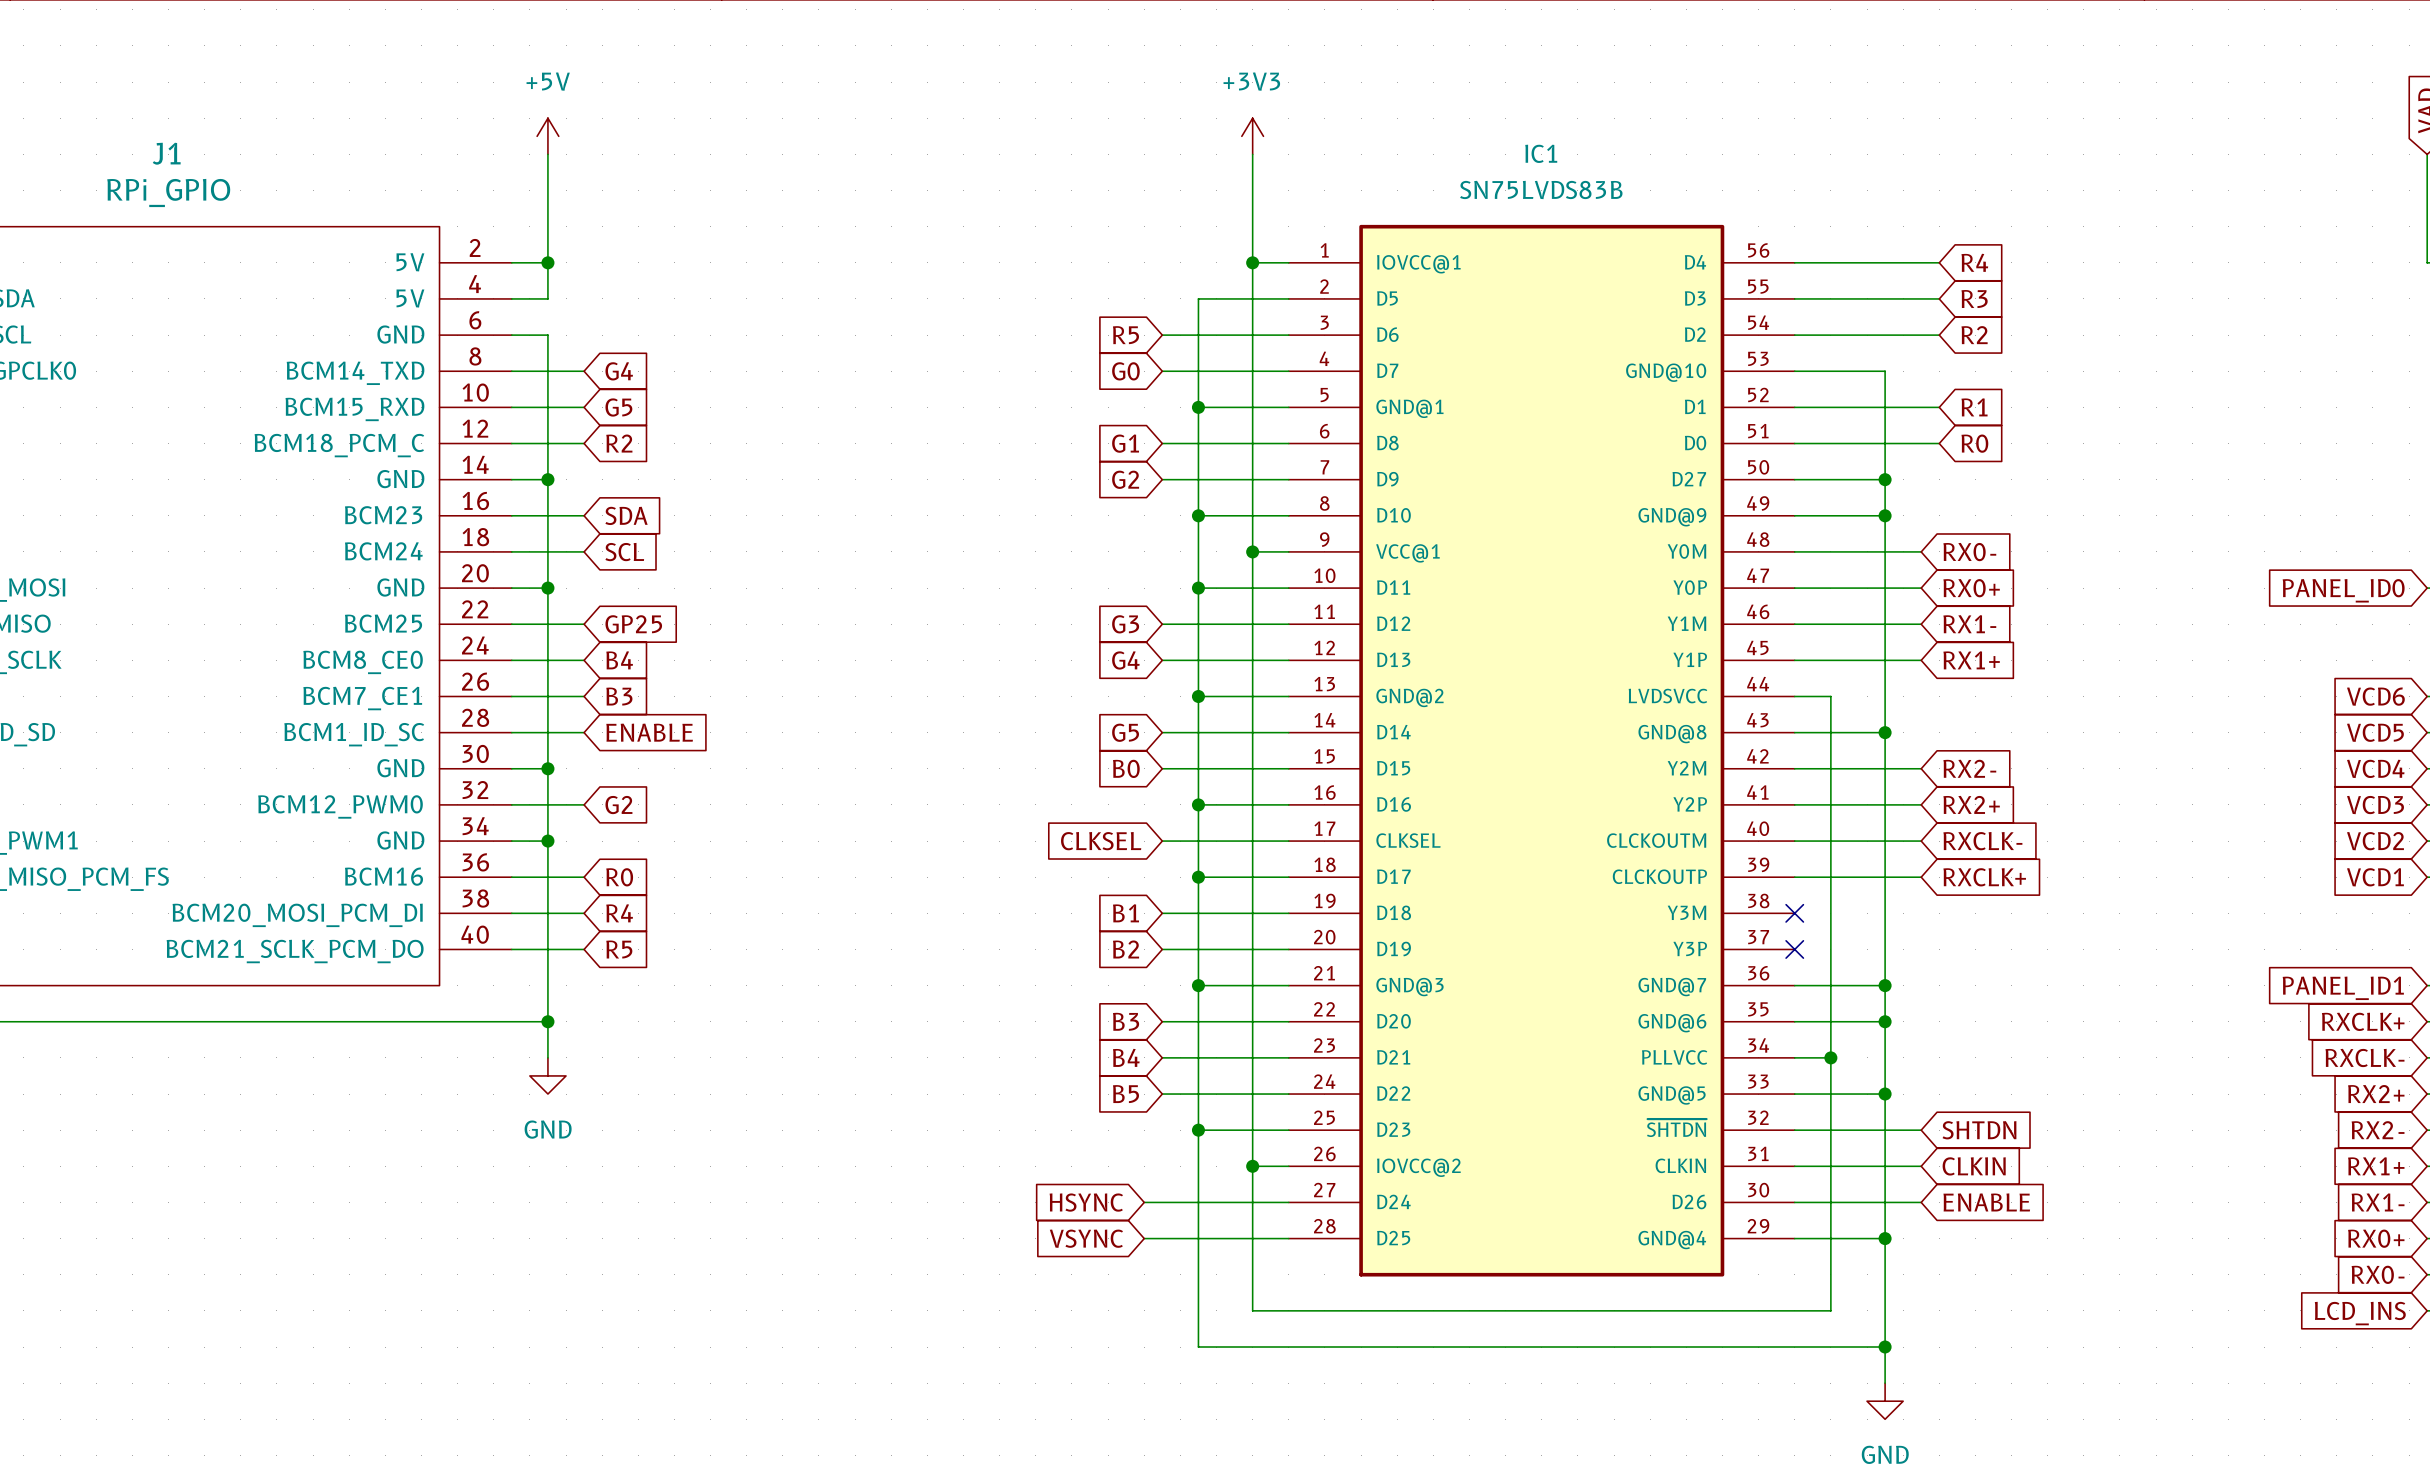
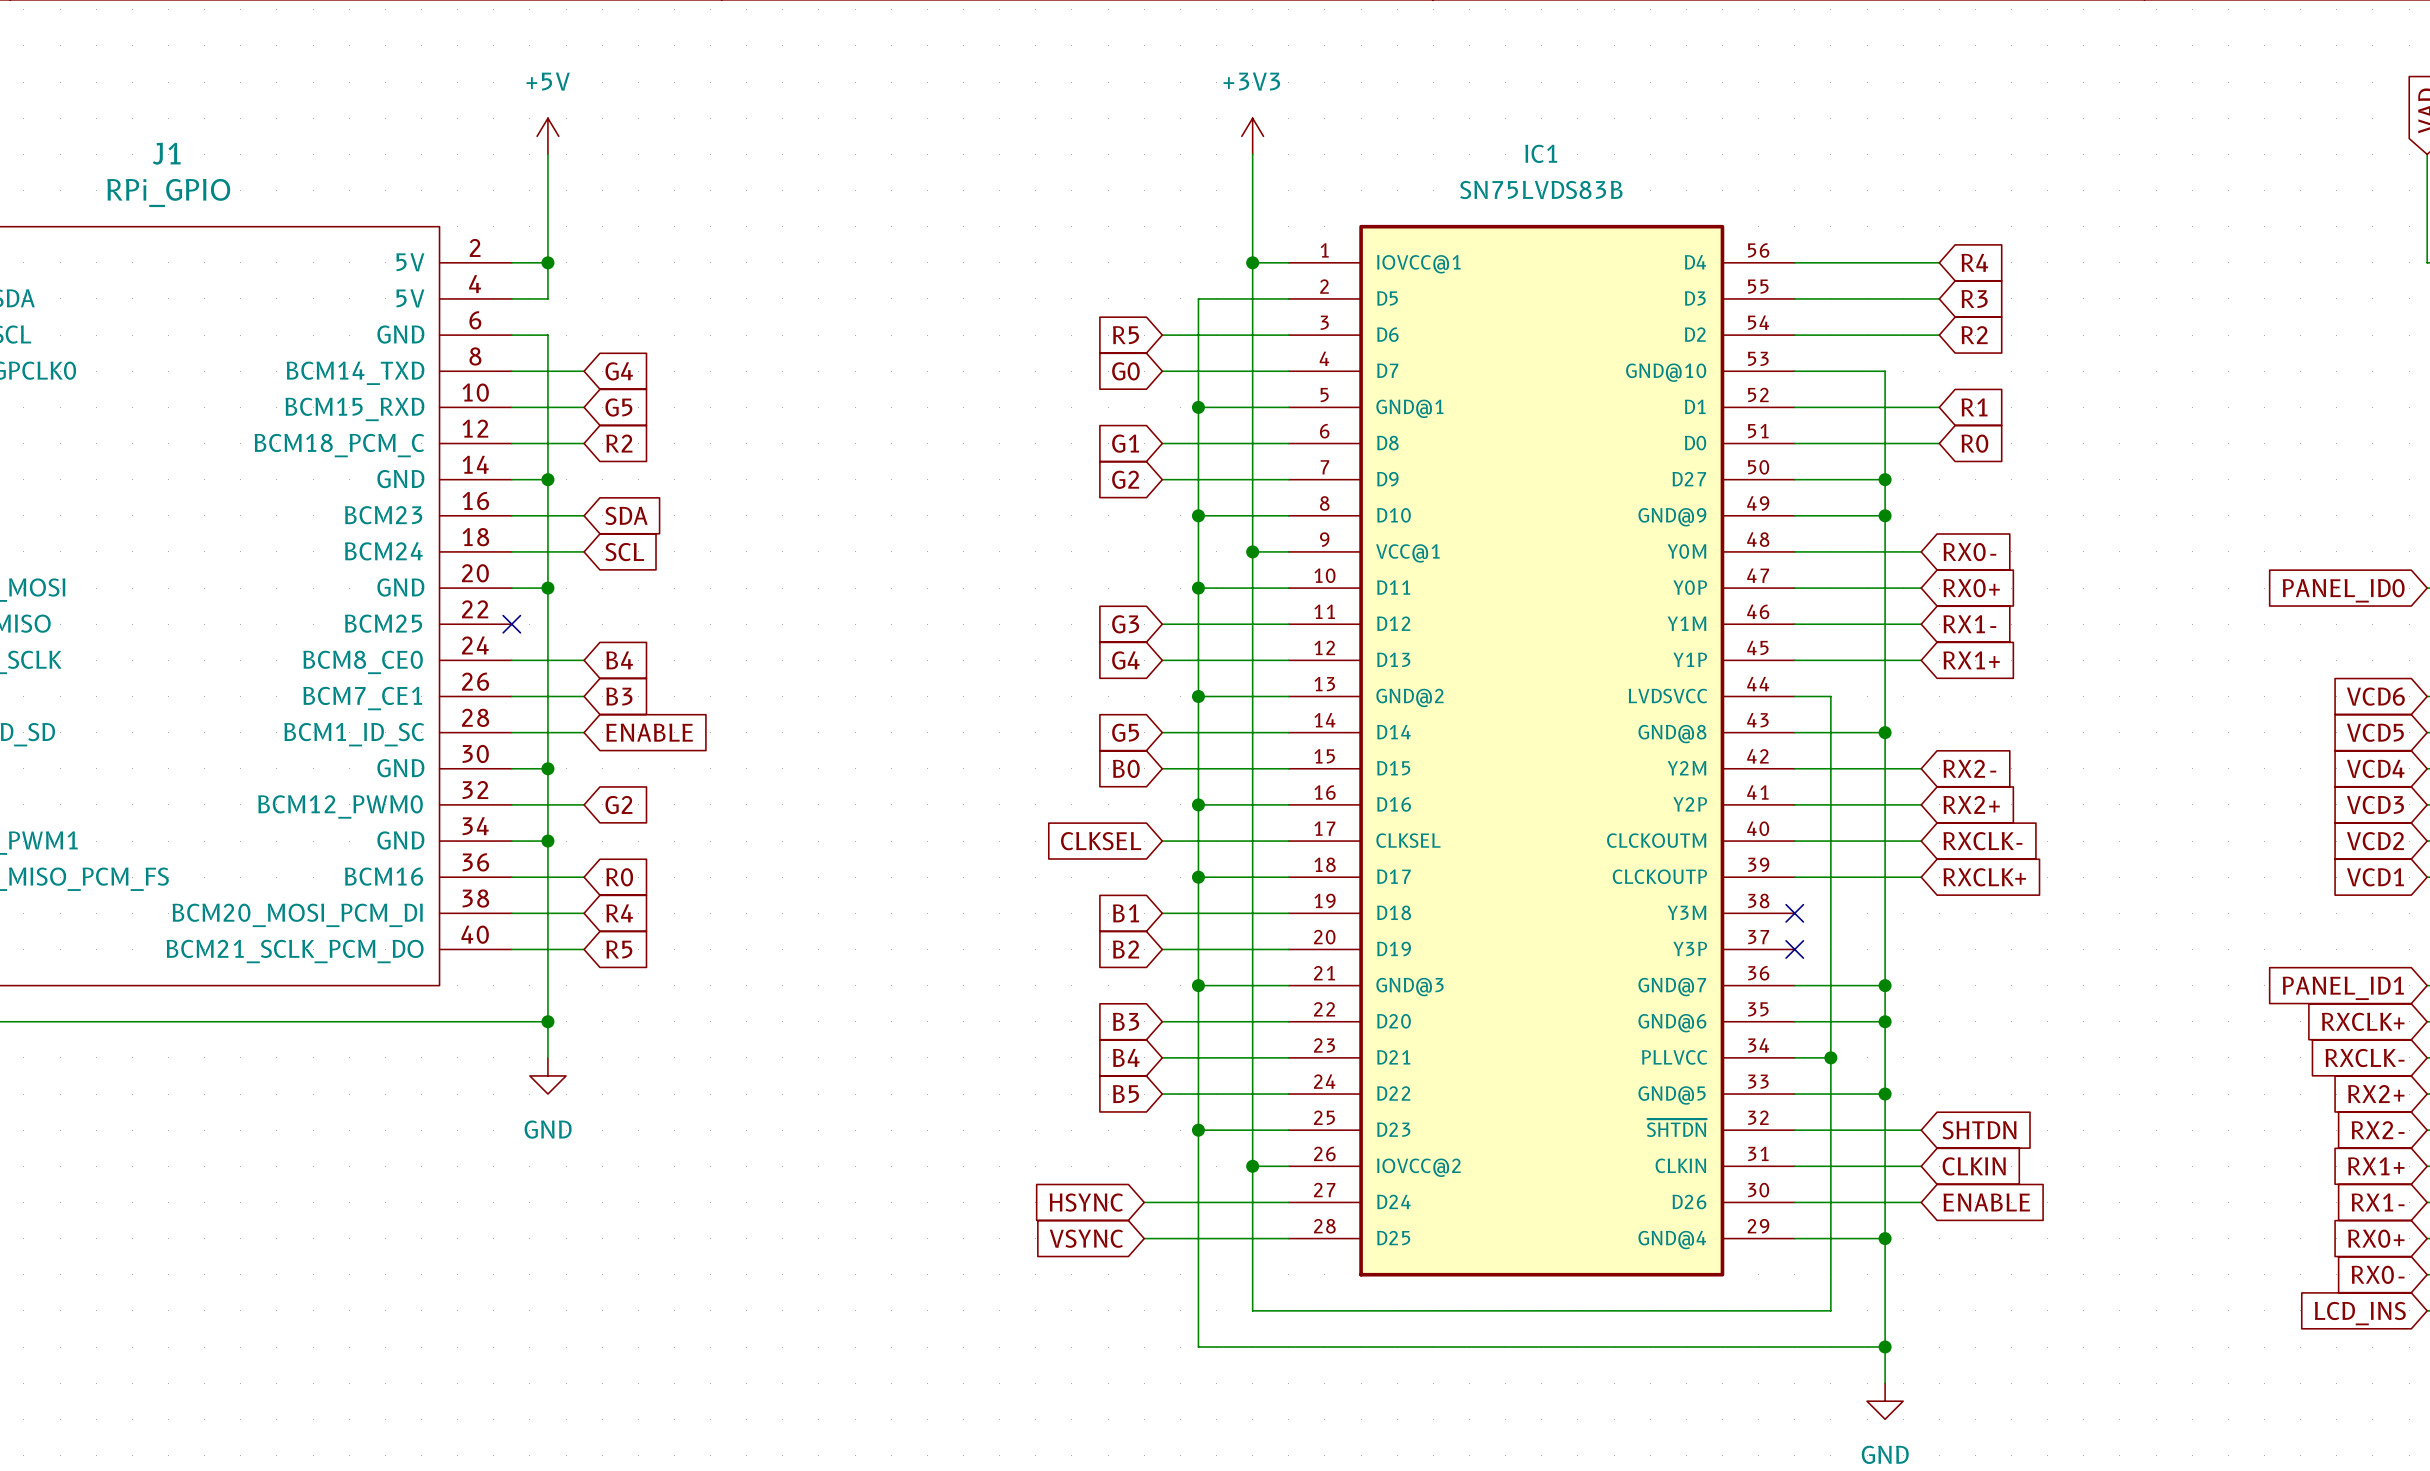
wire: (511, 624) (584, 624) -> none
no-connect mark: none -> (511, 624)
global label: GP25 (633, 624) -> none

